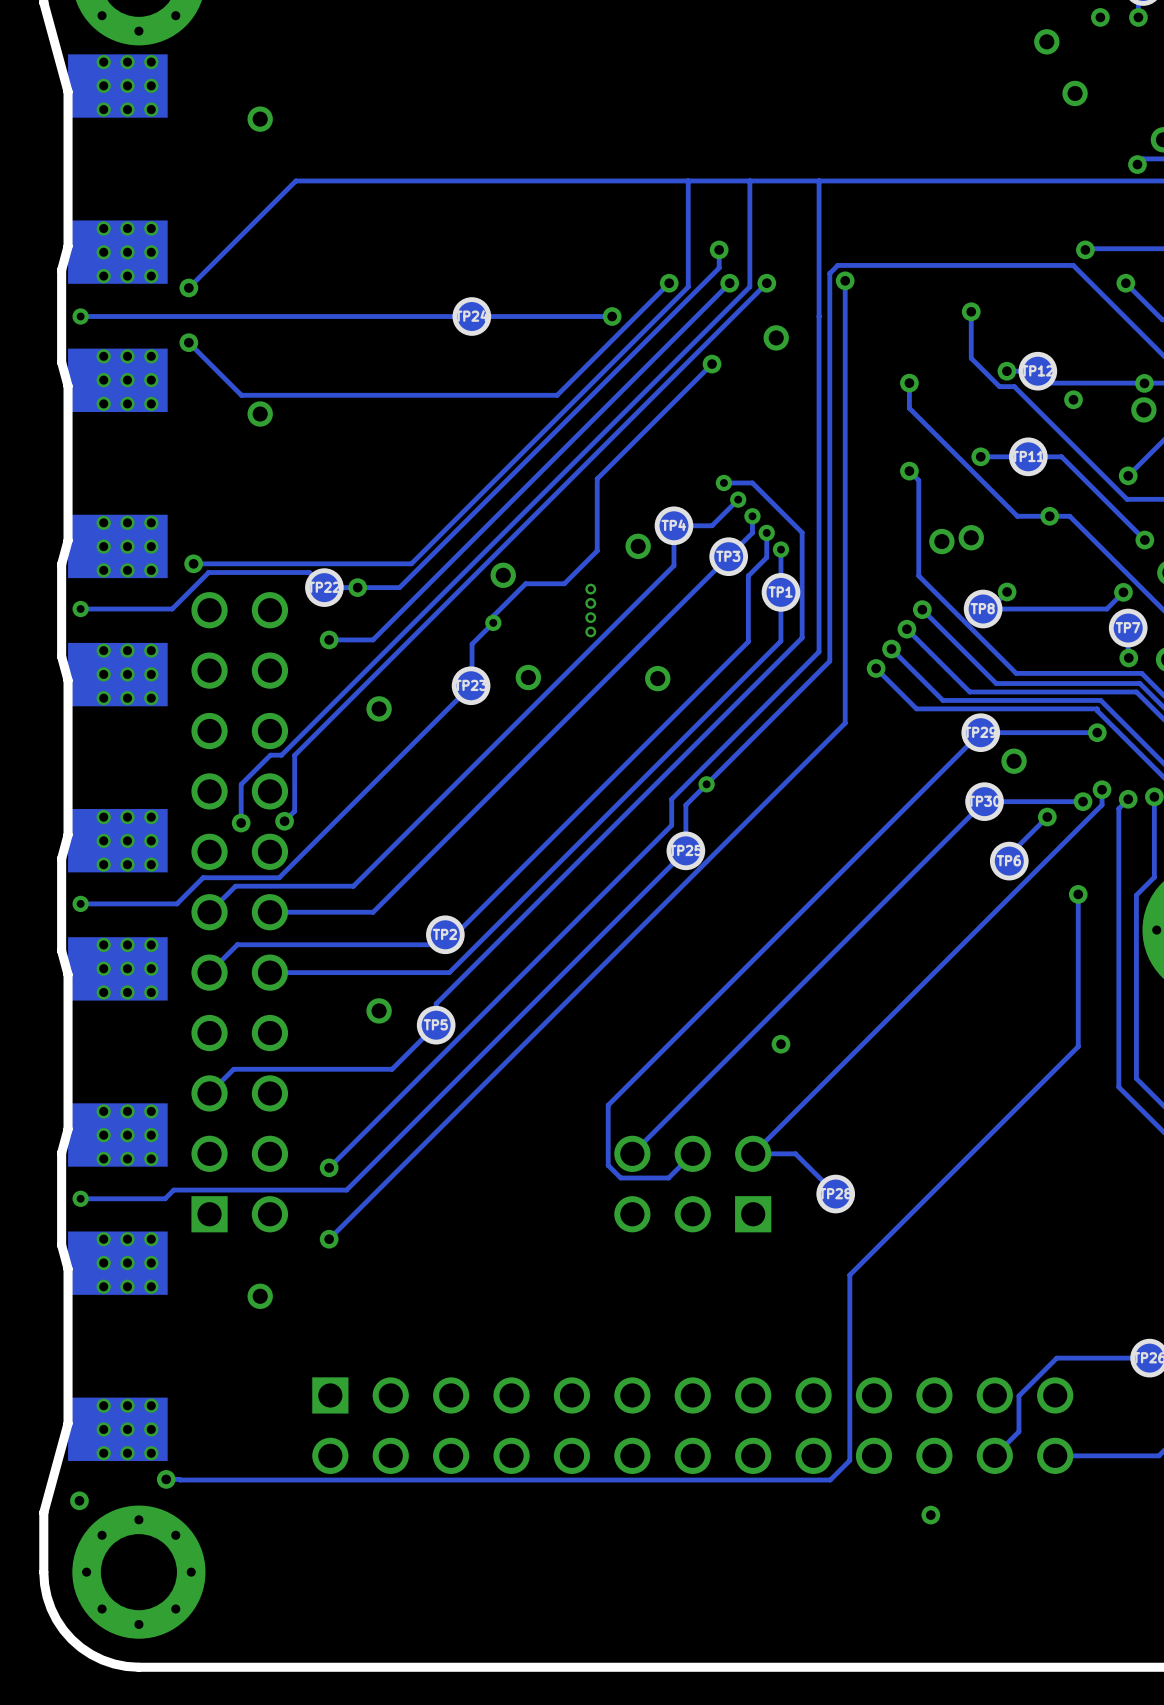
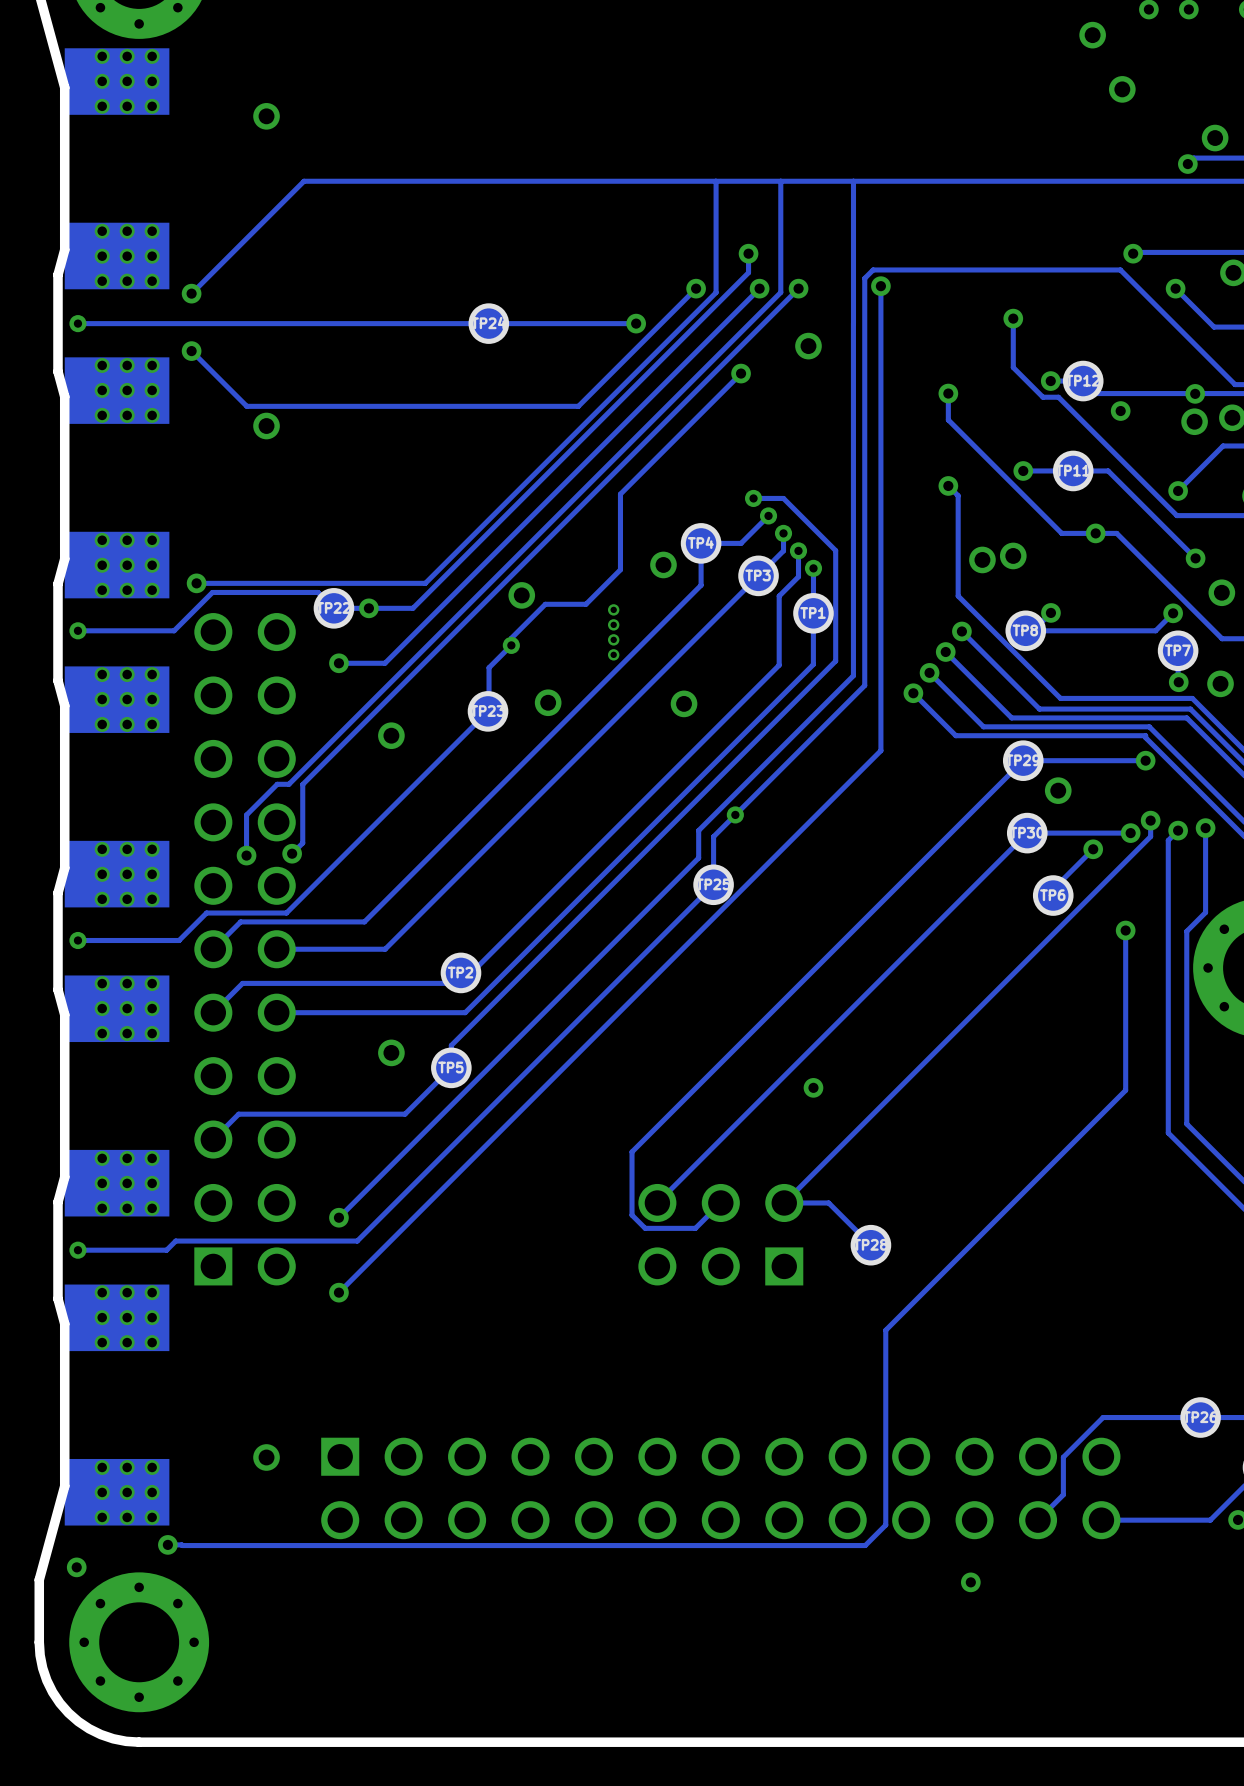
via position: (260, 1296) -> (266, 1457)

